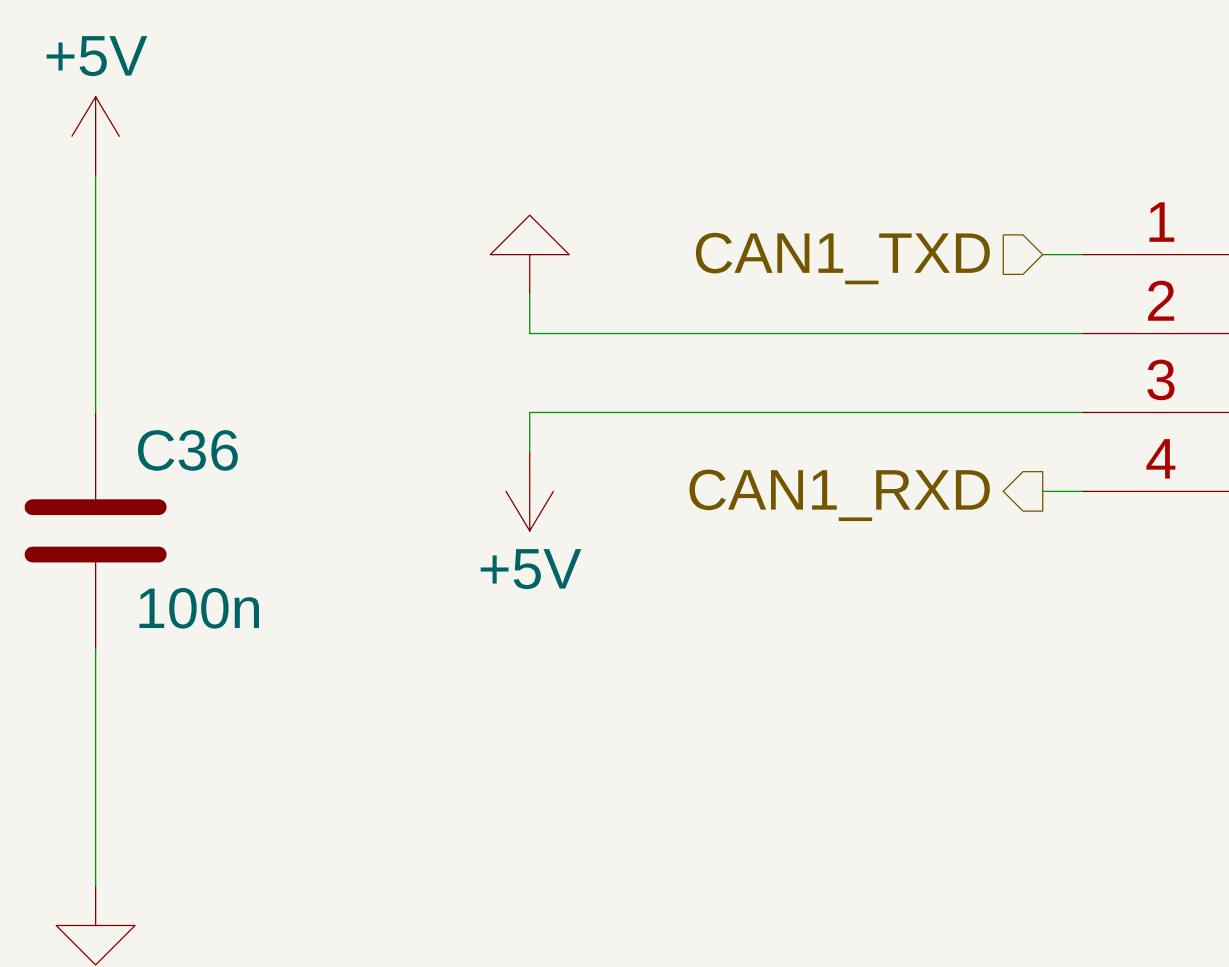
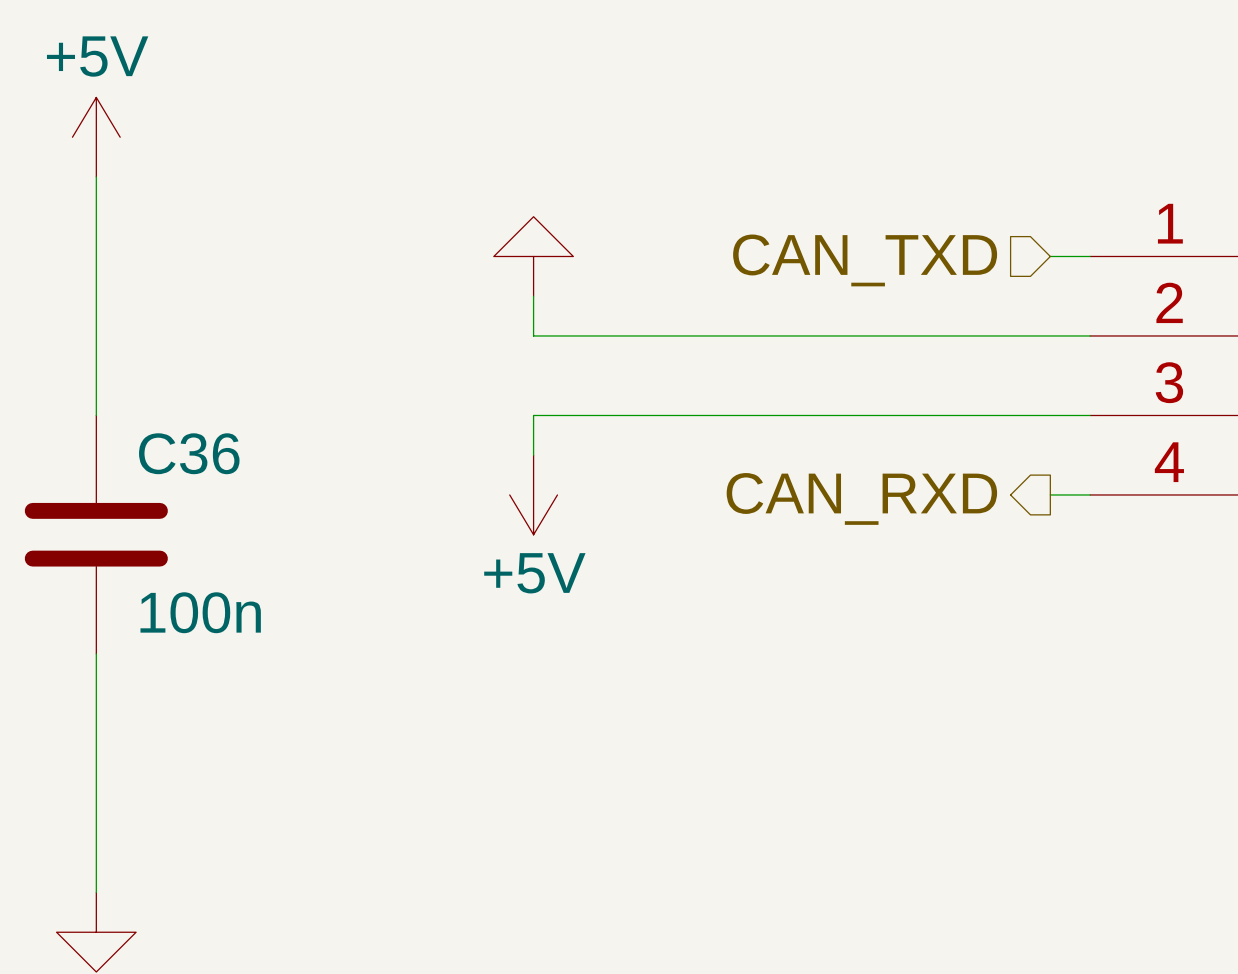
hierarchical label: CAN1_TXD (842, 258) -> CAN_TXD (865, 260)
hierarchical label: CAN1_RXD (839, 495) -> CAN_RXD (861, 498)

